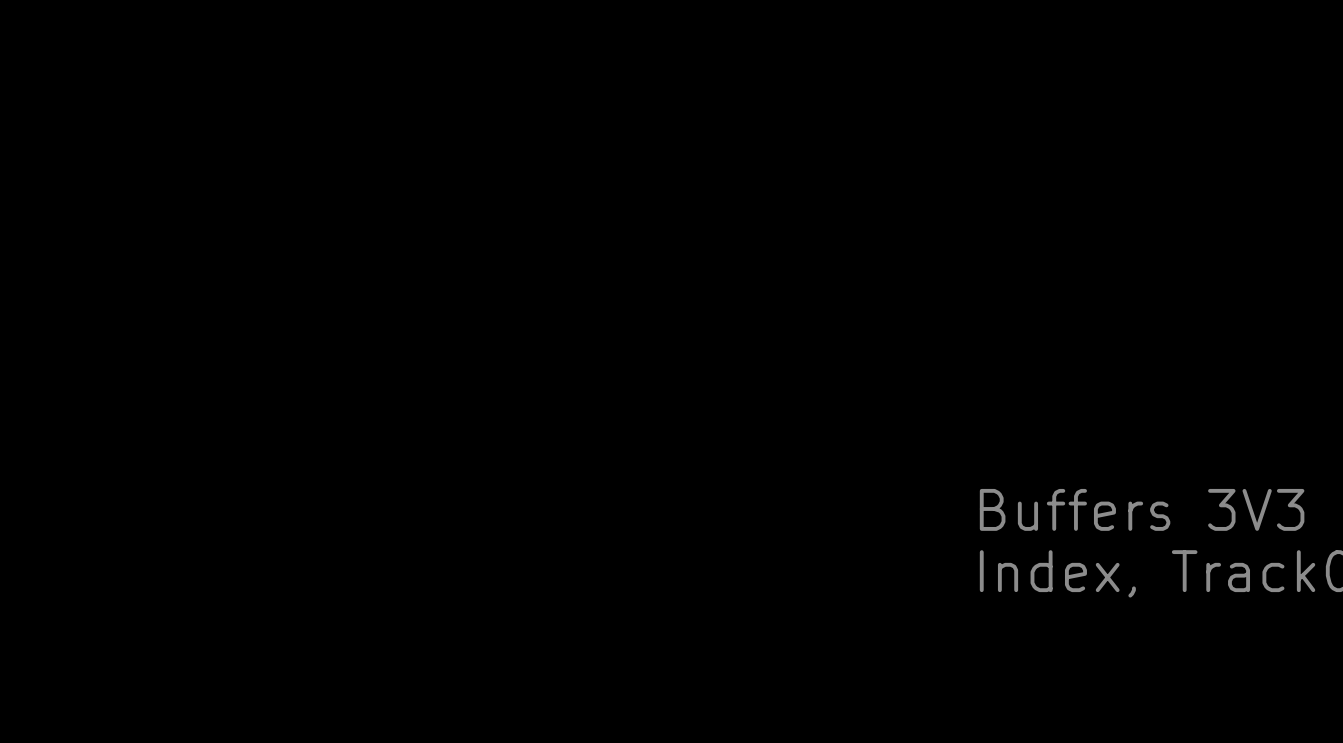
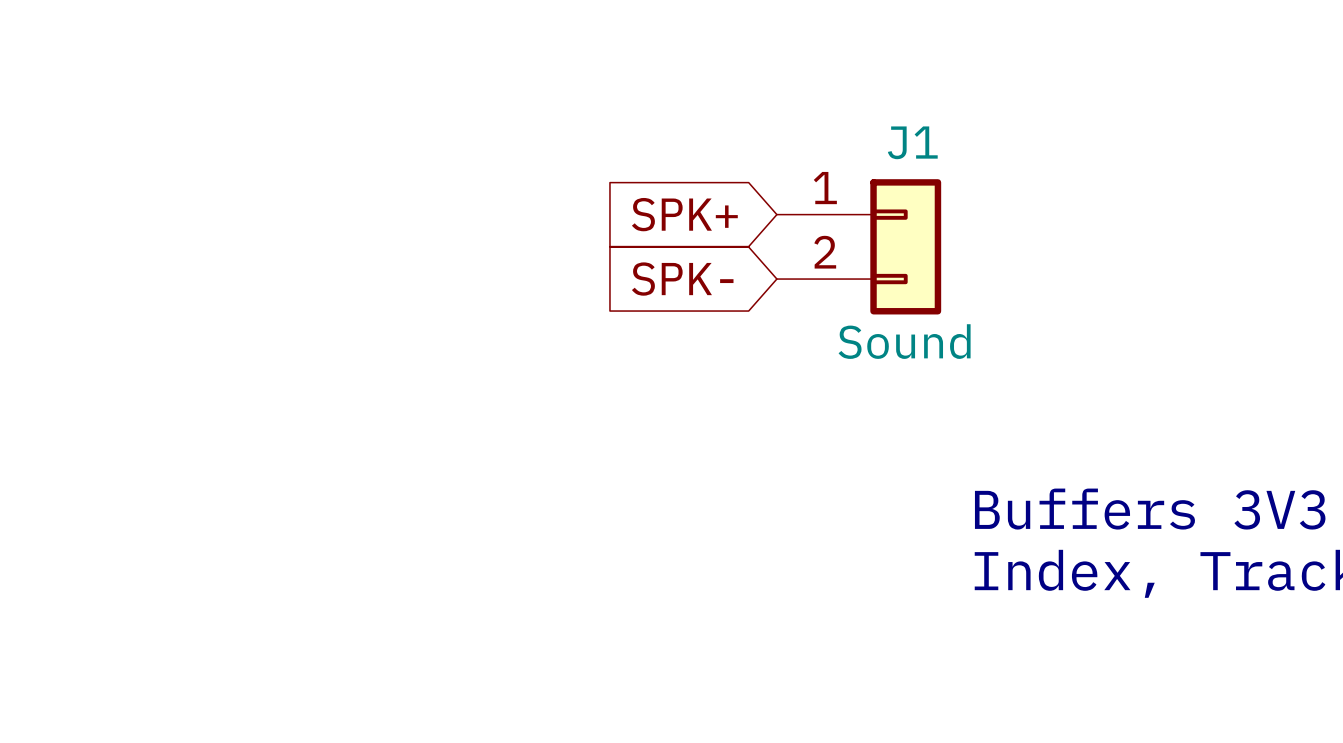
global label: none -> SPK+ (684, 214)
J1: none -> Sound (859, 246)
global label: none -> SPK- (682, 279)

